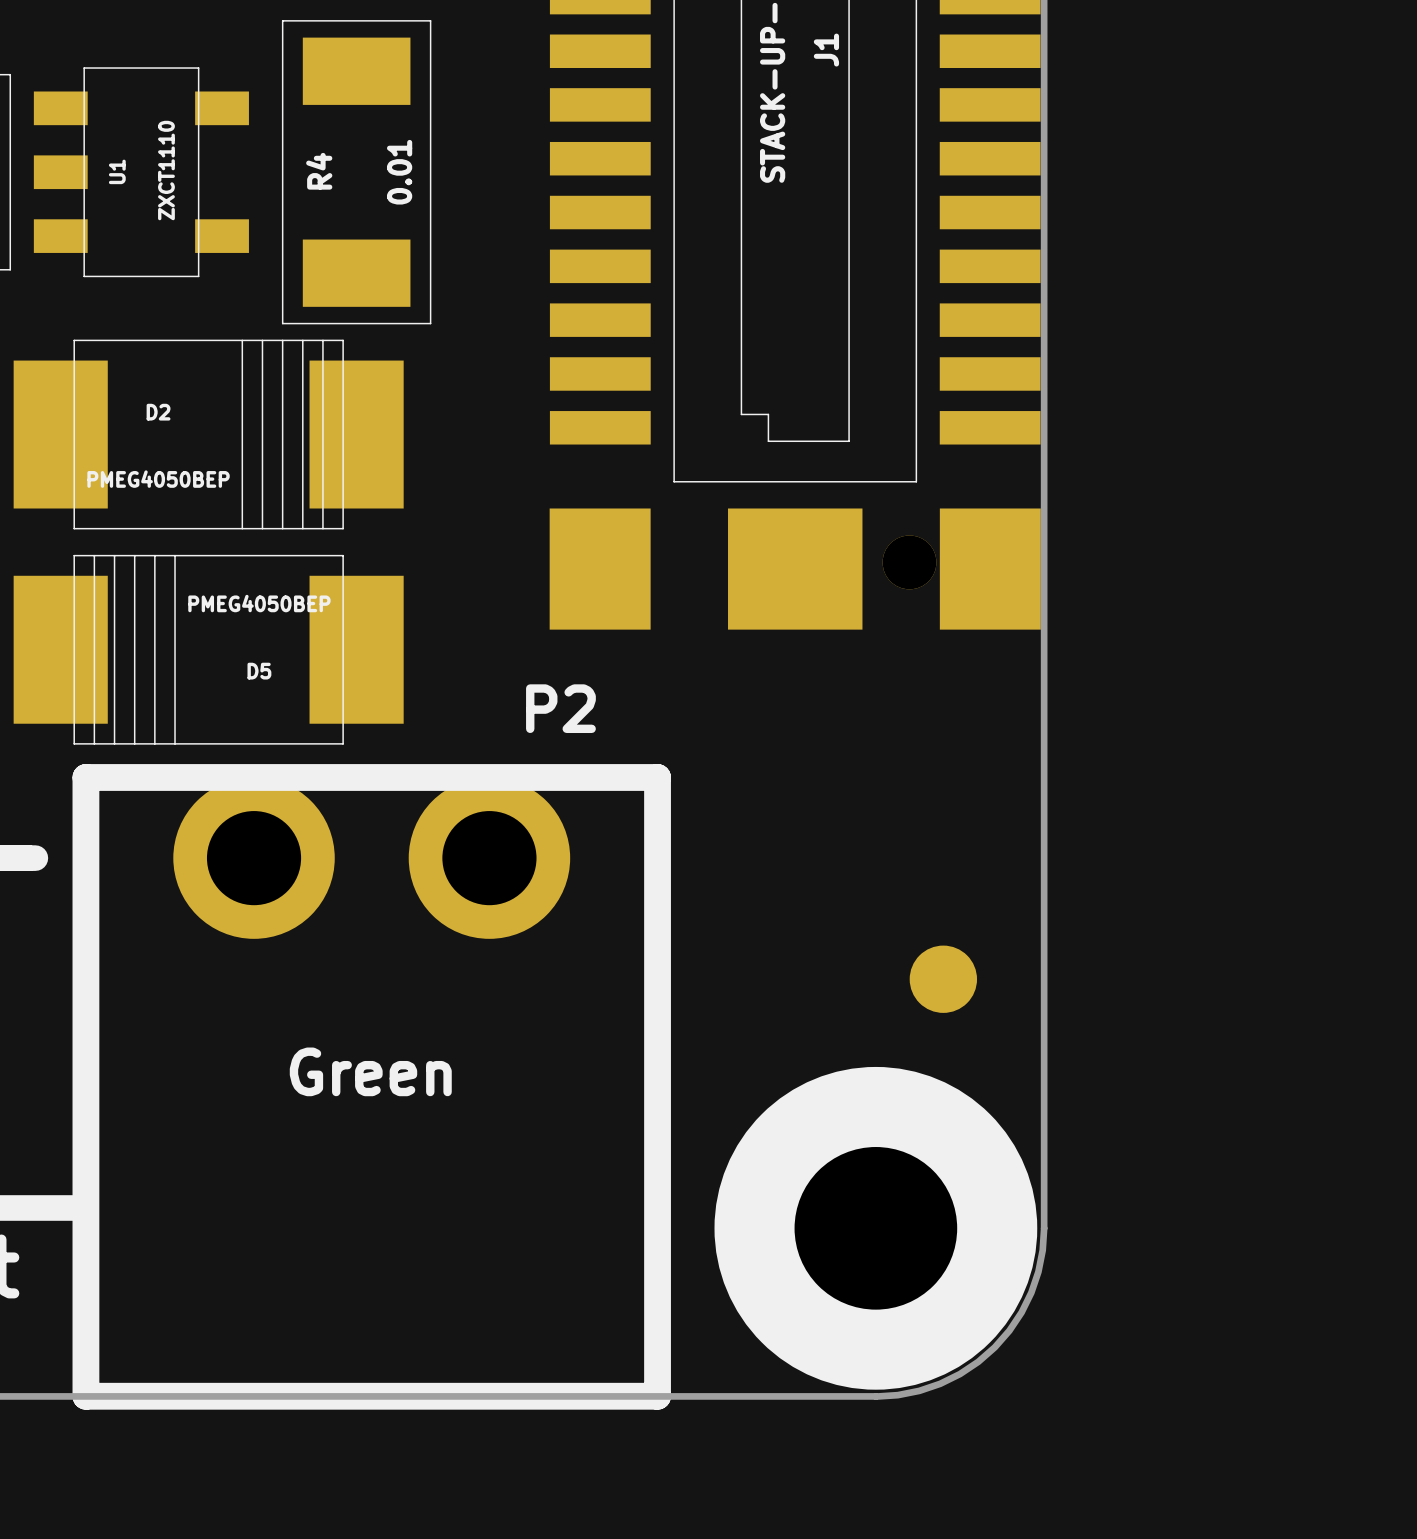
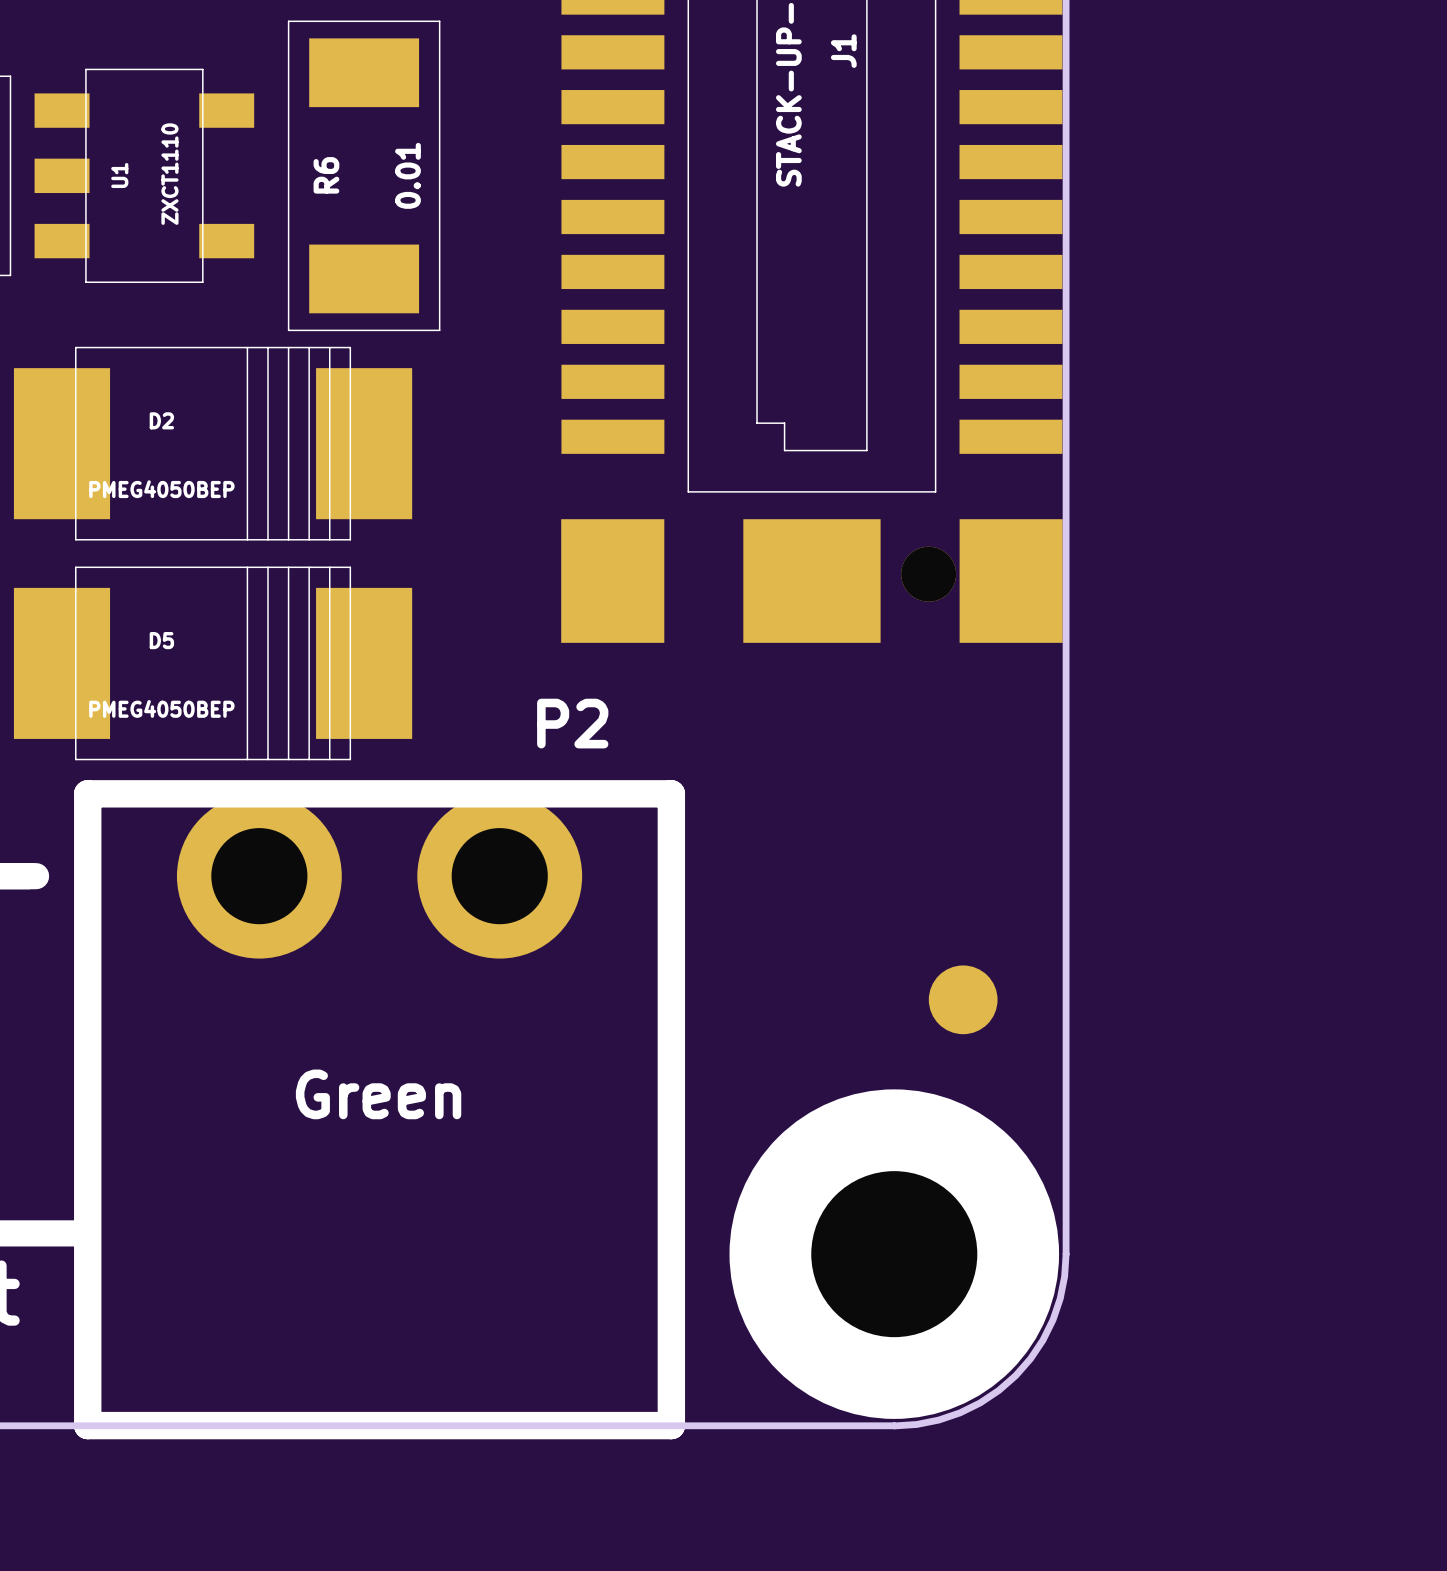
R4 name: R4 (319, 171) -> R6 (326, 175)
D5 rotation: 0° (208, 649) -> 180° (213, 663)

